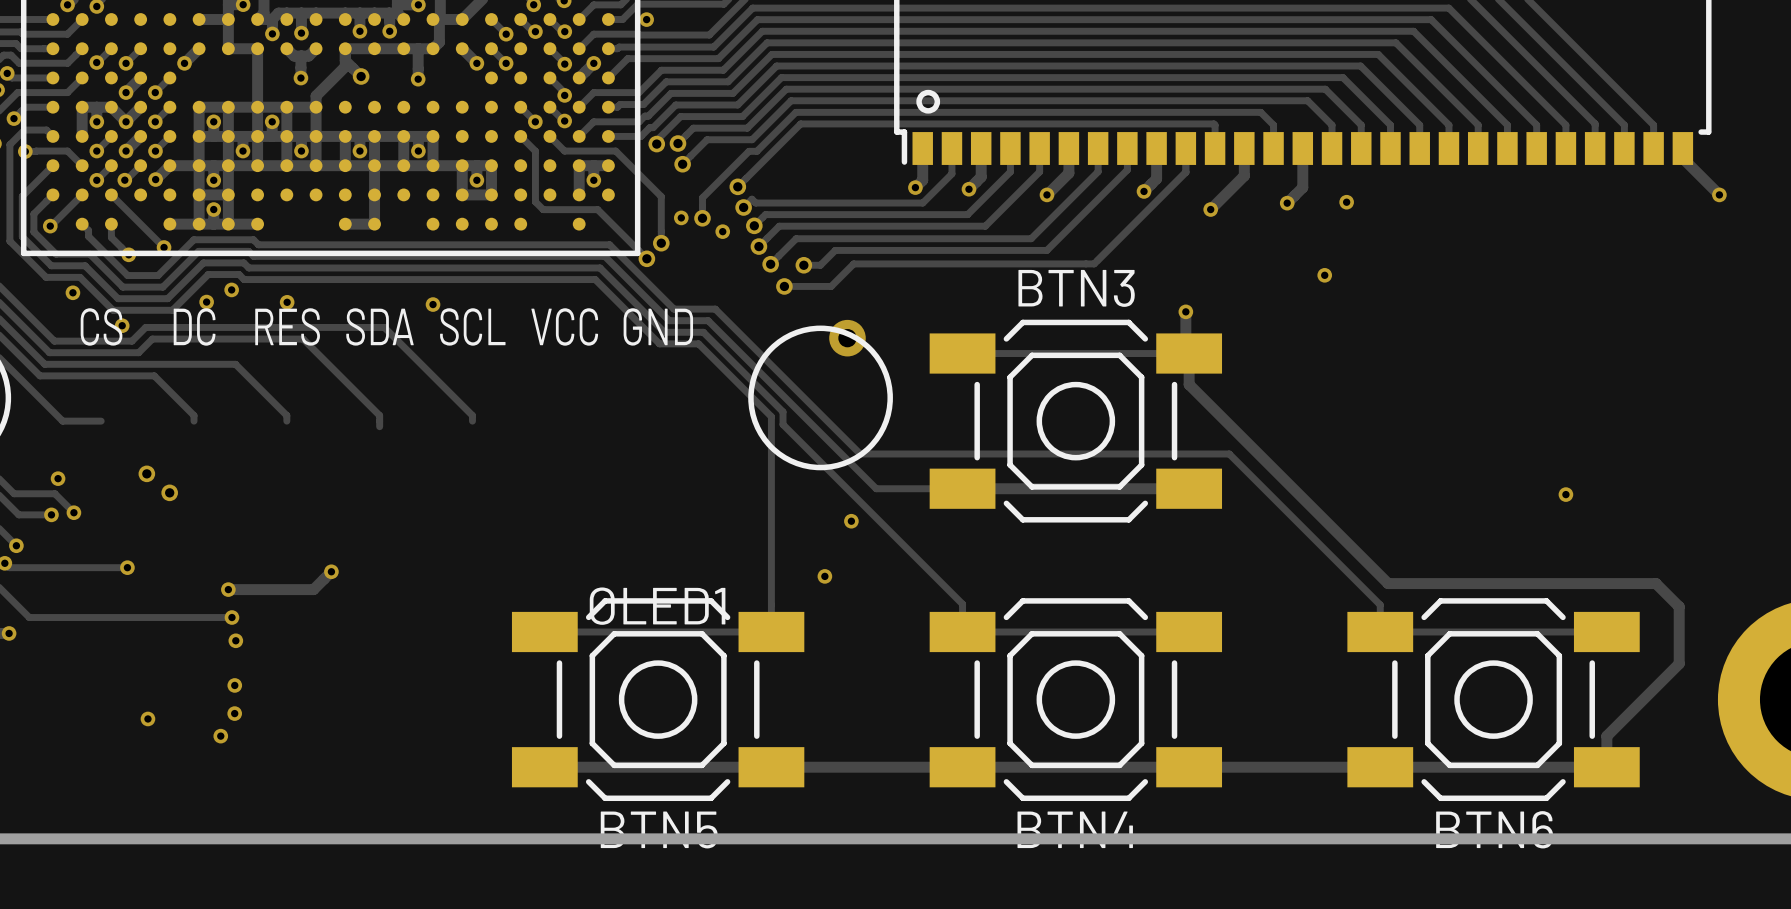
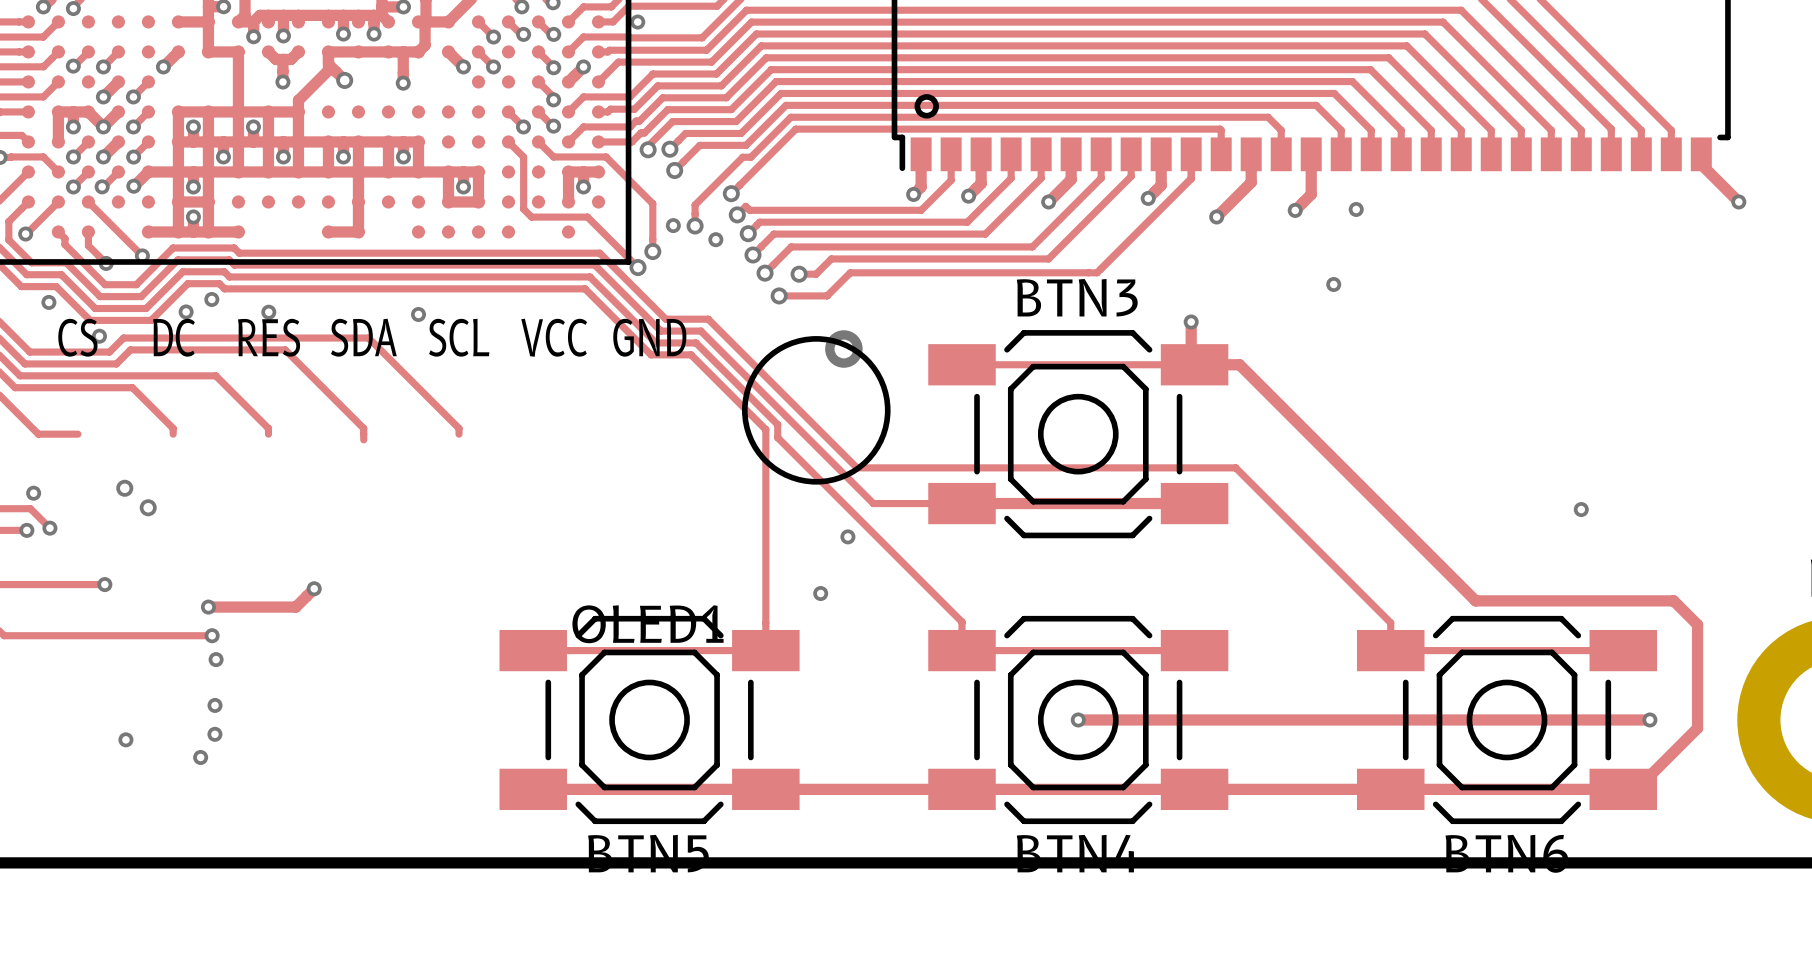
track: (1189, 353) (1189, 384) (1388, 583) (1463, 583) -> (1194, 364) (1239, 364) (1475, 600)
track: (1679, 663) (1606, 736) (1606, 767) -> (1697, 683) (1697, 728) (1636, 789) (1623, 789)
track: none -> (1078, 719) (1649, 719)
via: none -> (1078, 719)
via: none -> (1649, 719)

